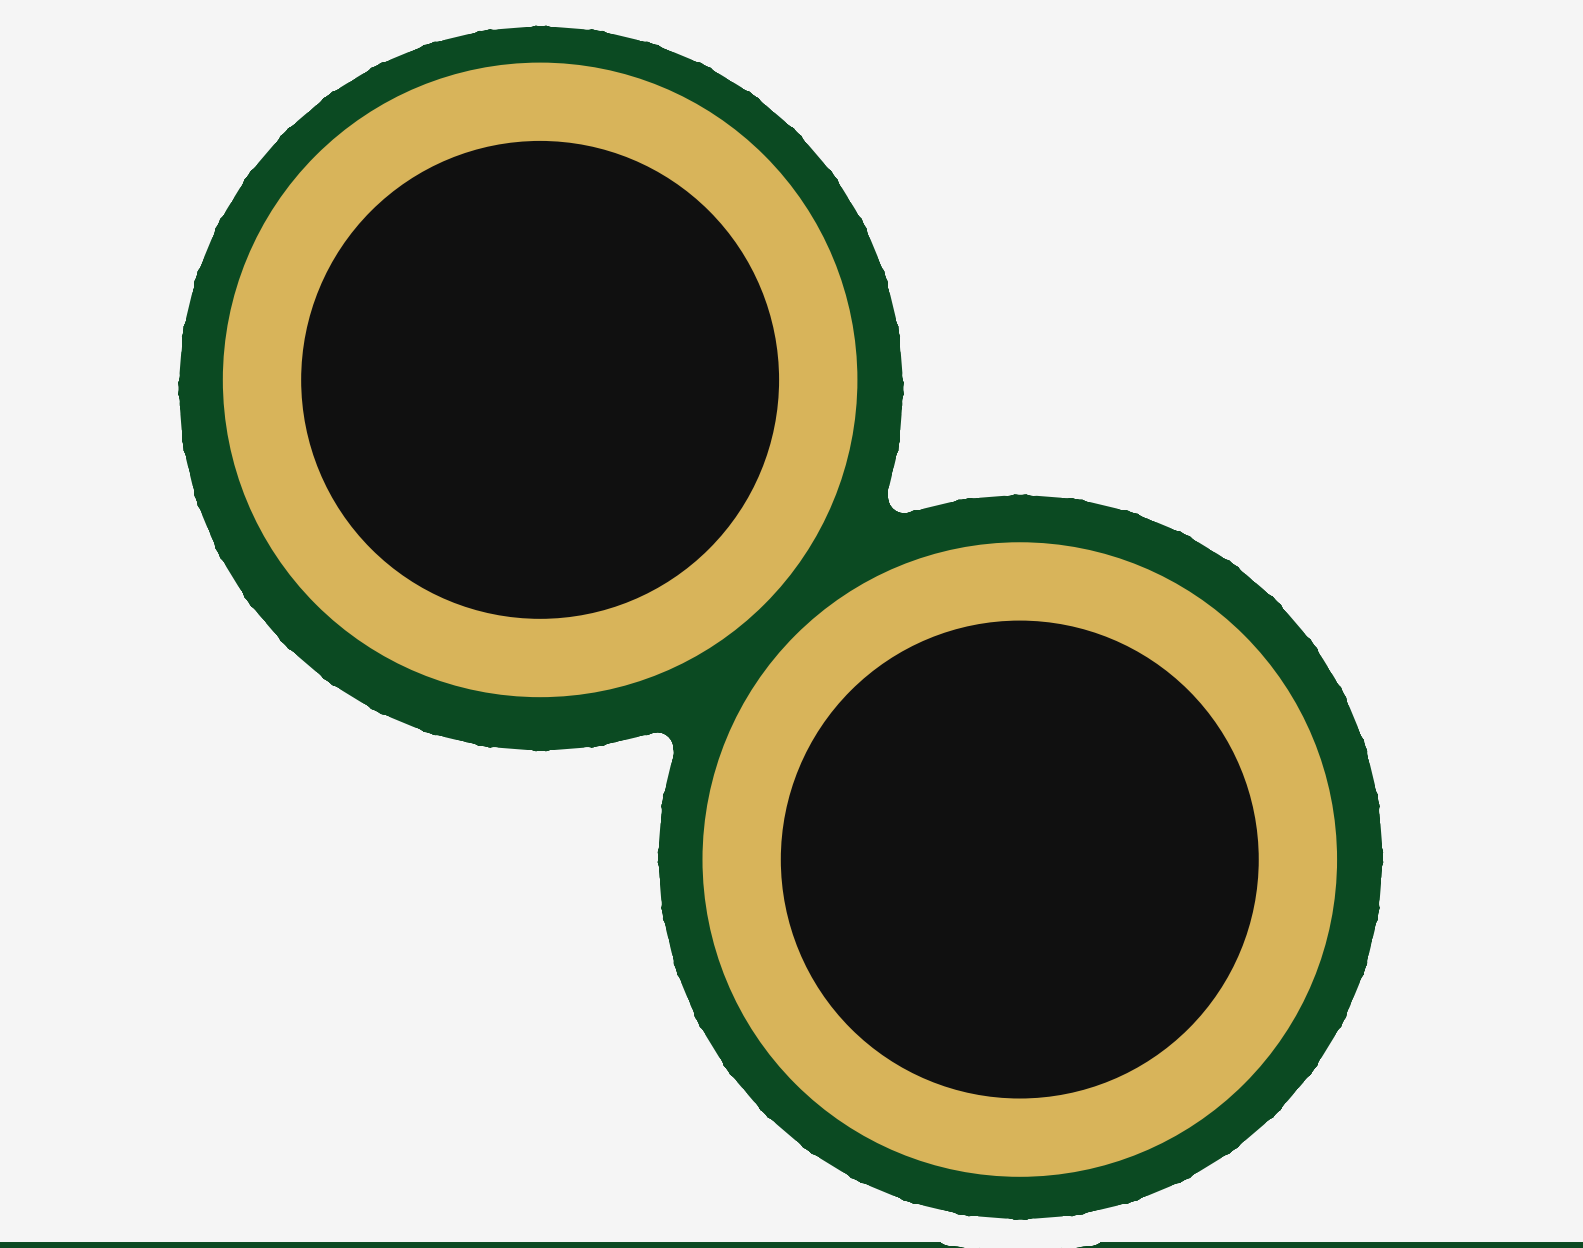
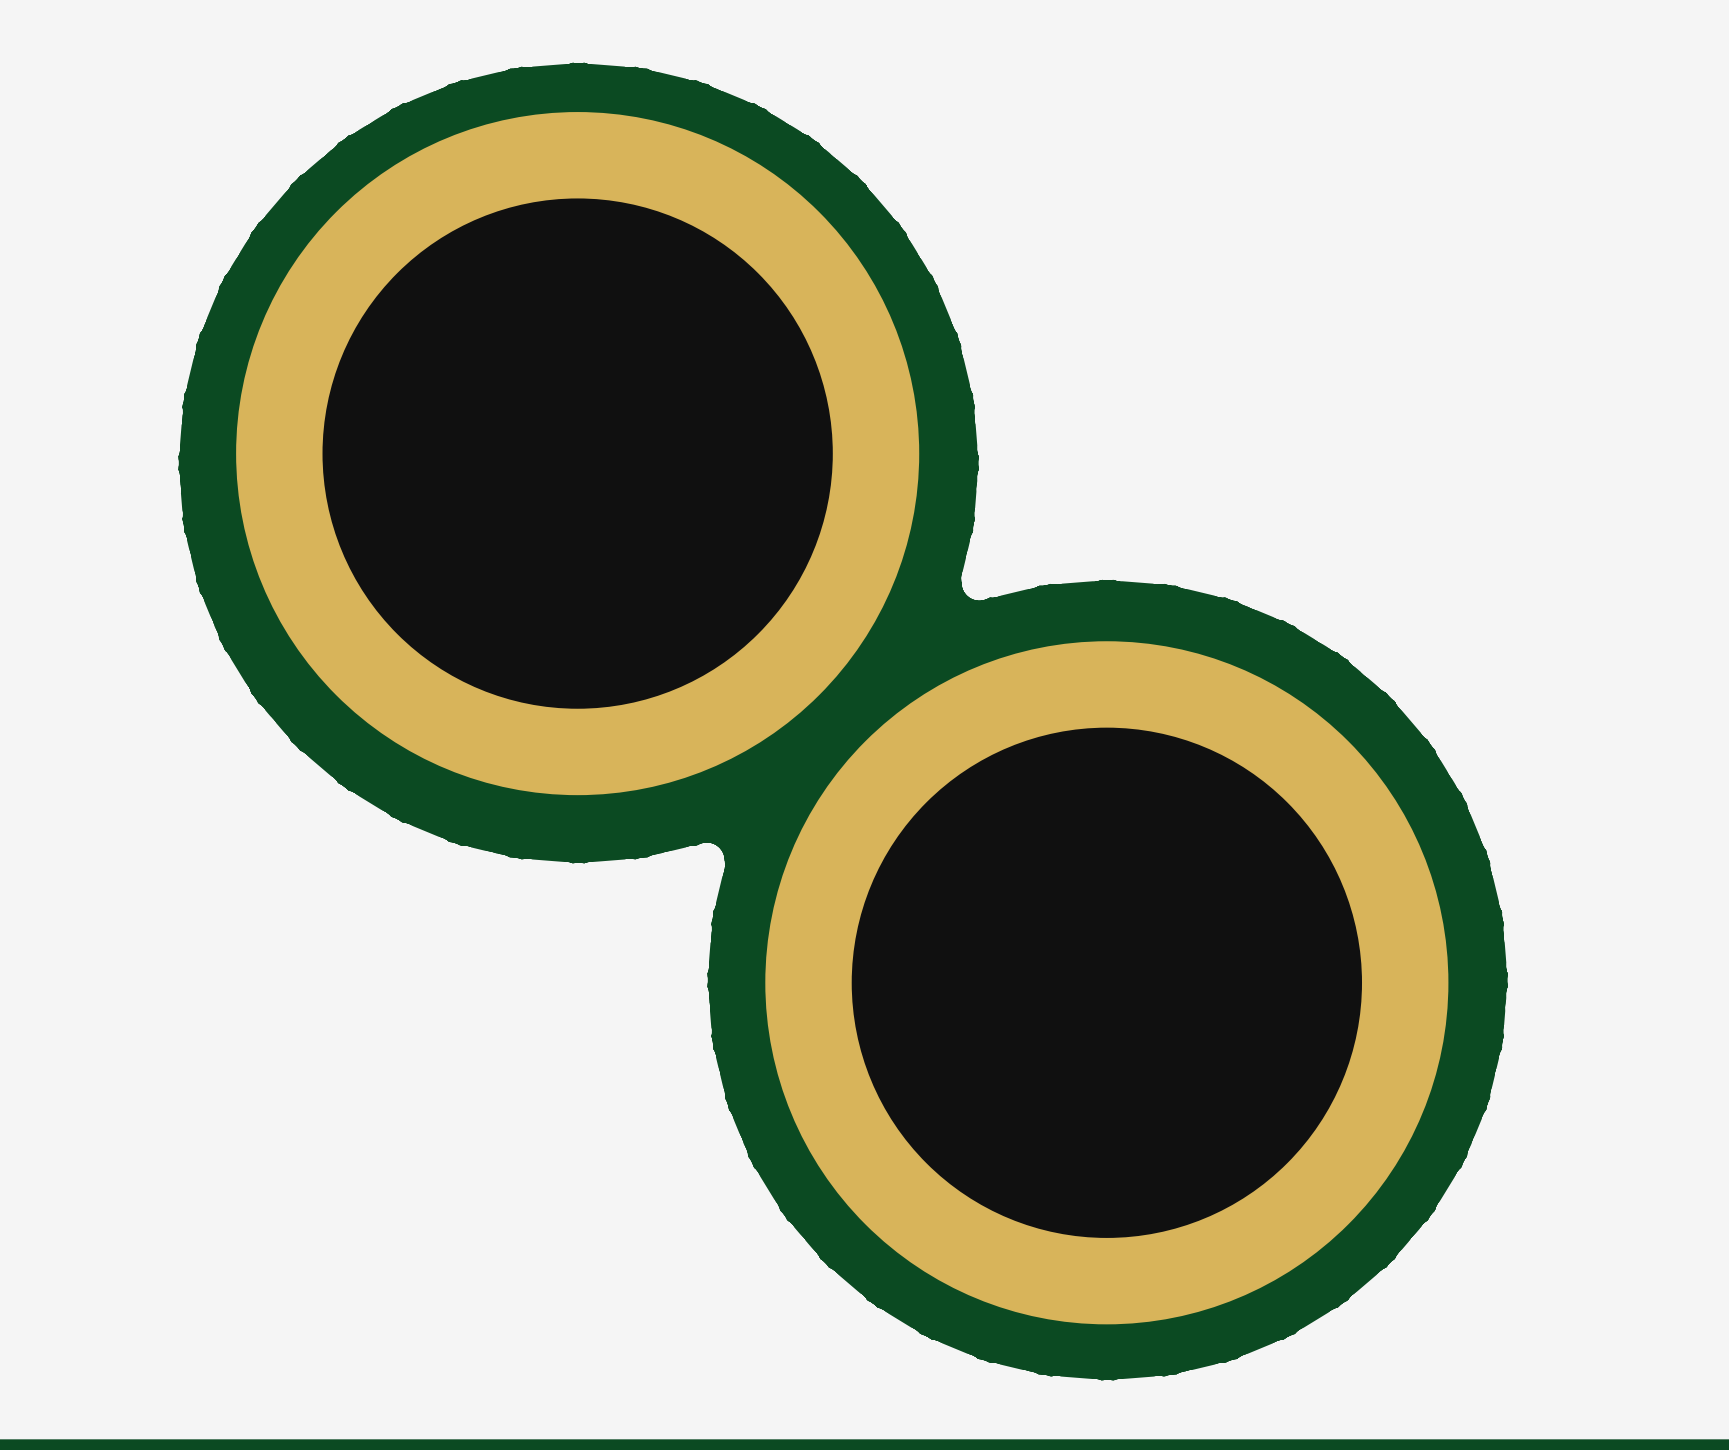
part footprint: [222, 62, 1338, 1177] -> [236, 112, 1449, 1325]

